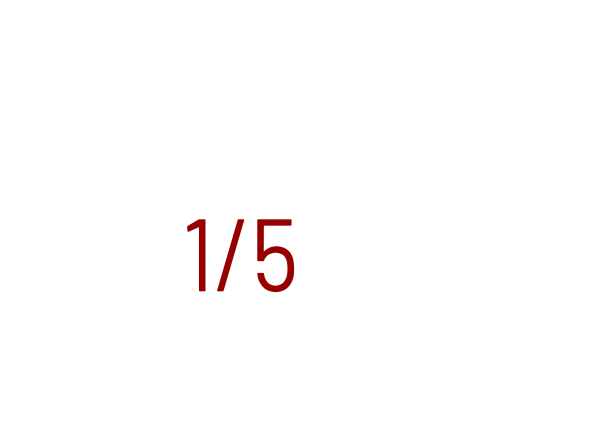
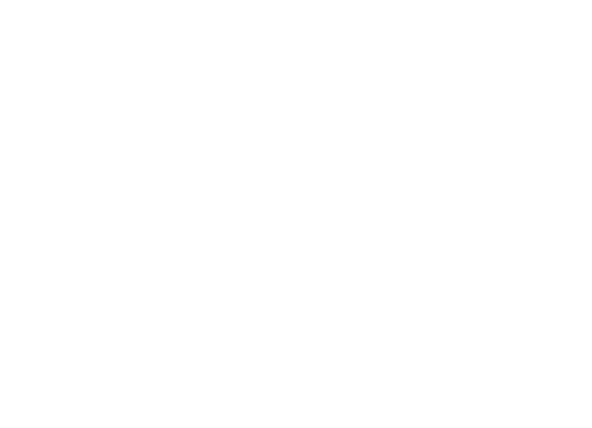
text: 1/5 (240, 255) -> none

